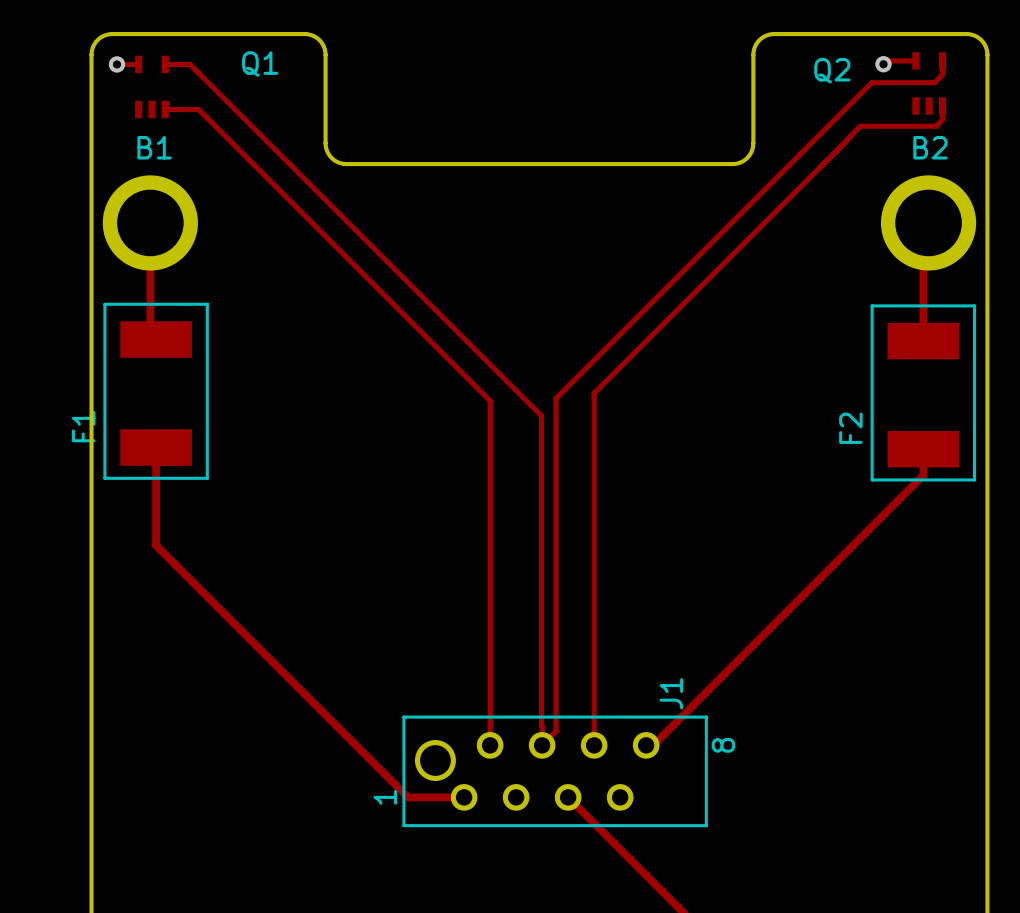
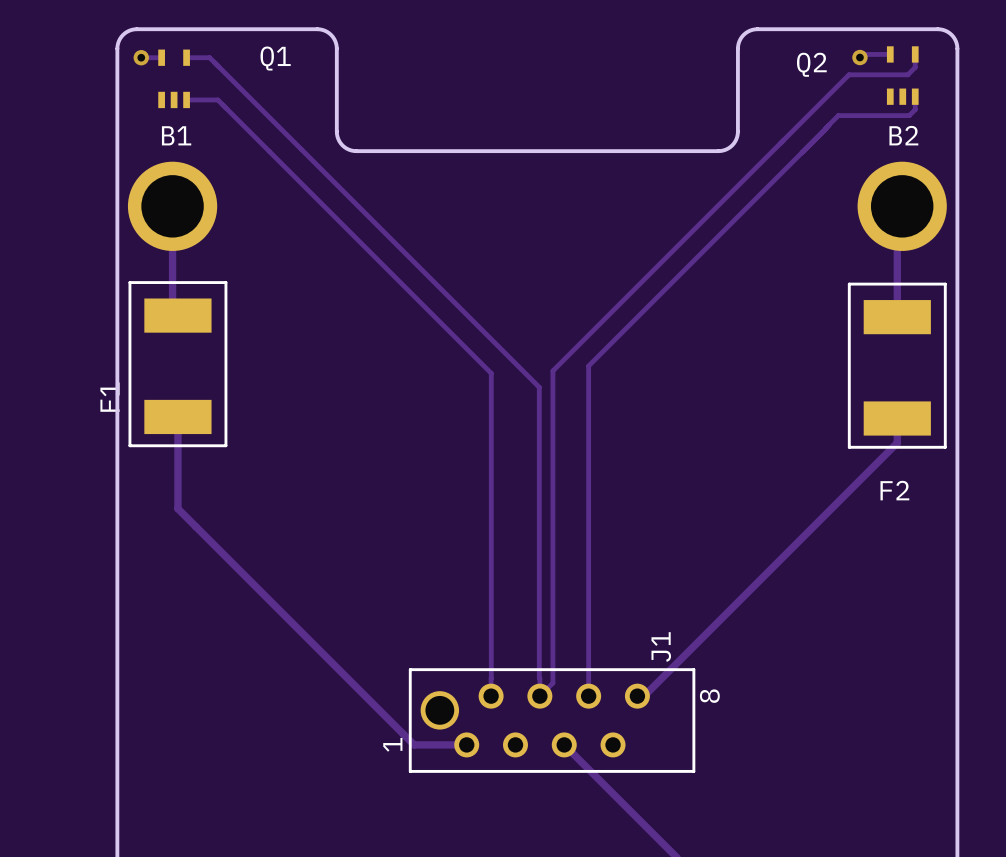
F2 name rotation: 0° (850, 428) -> 90° clockwise (894, 490)
F2 name position: F2 (850, 428) -> F2 (894, 490)

